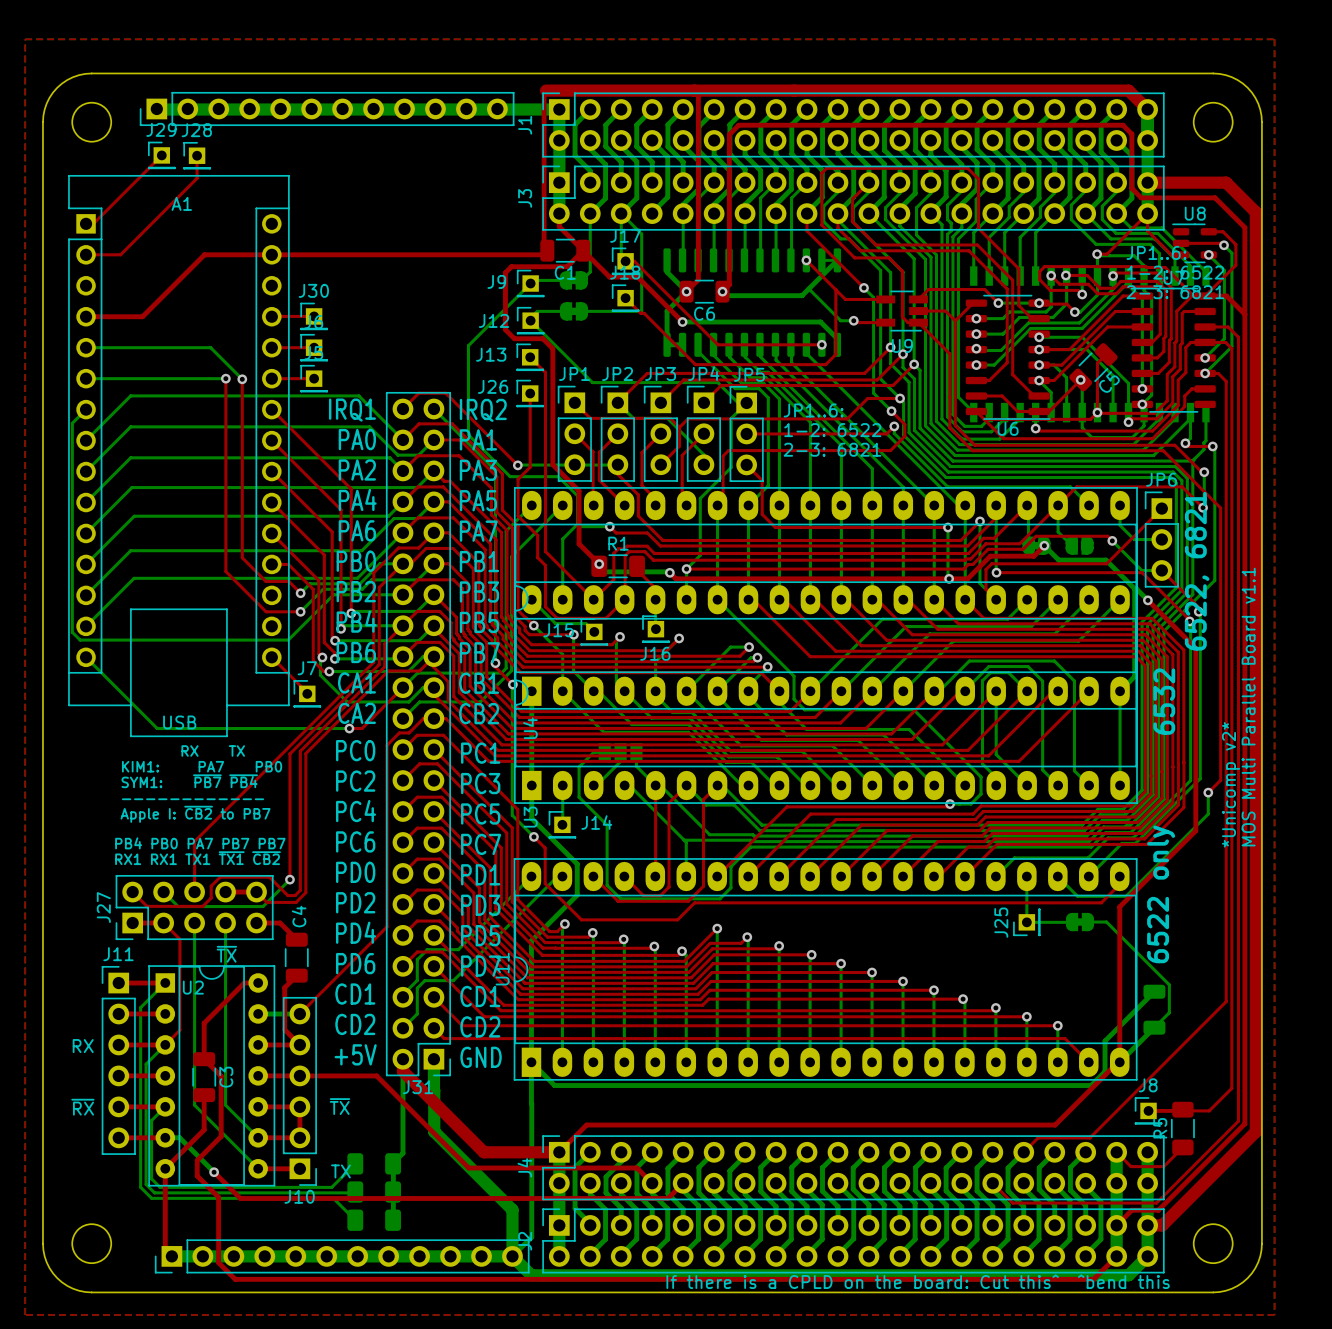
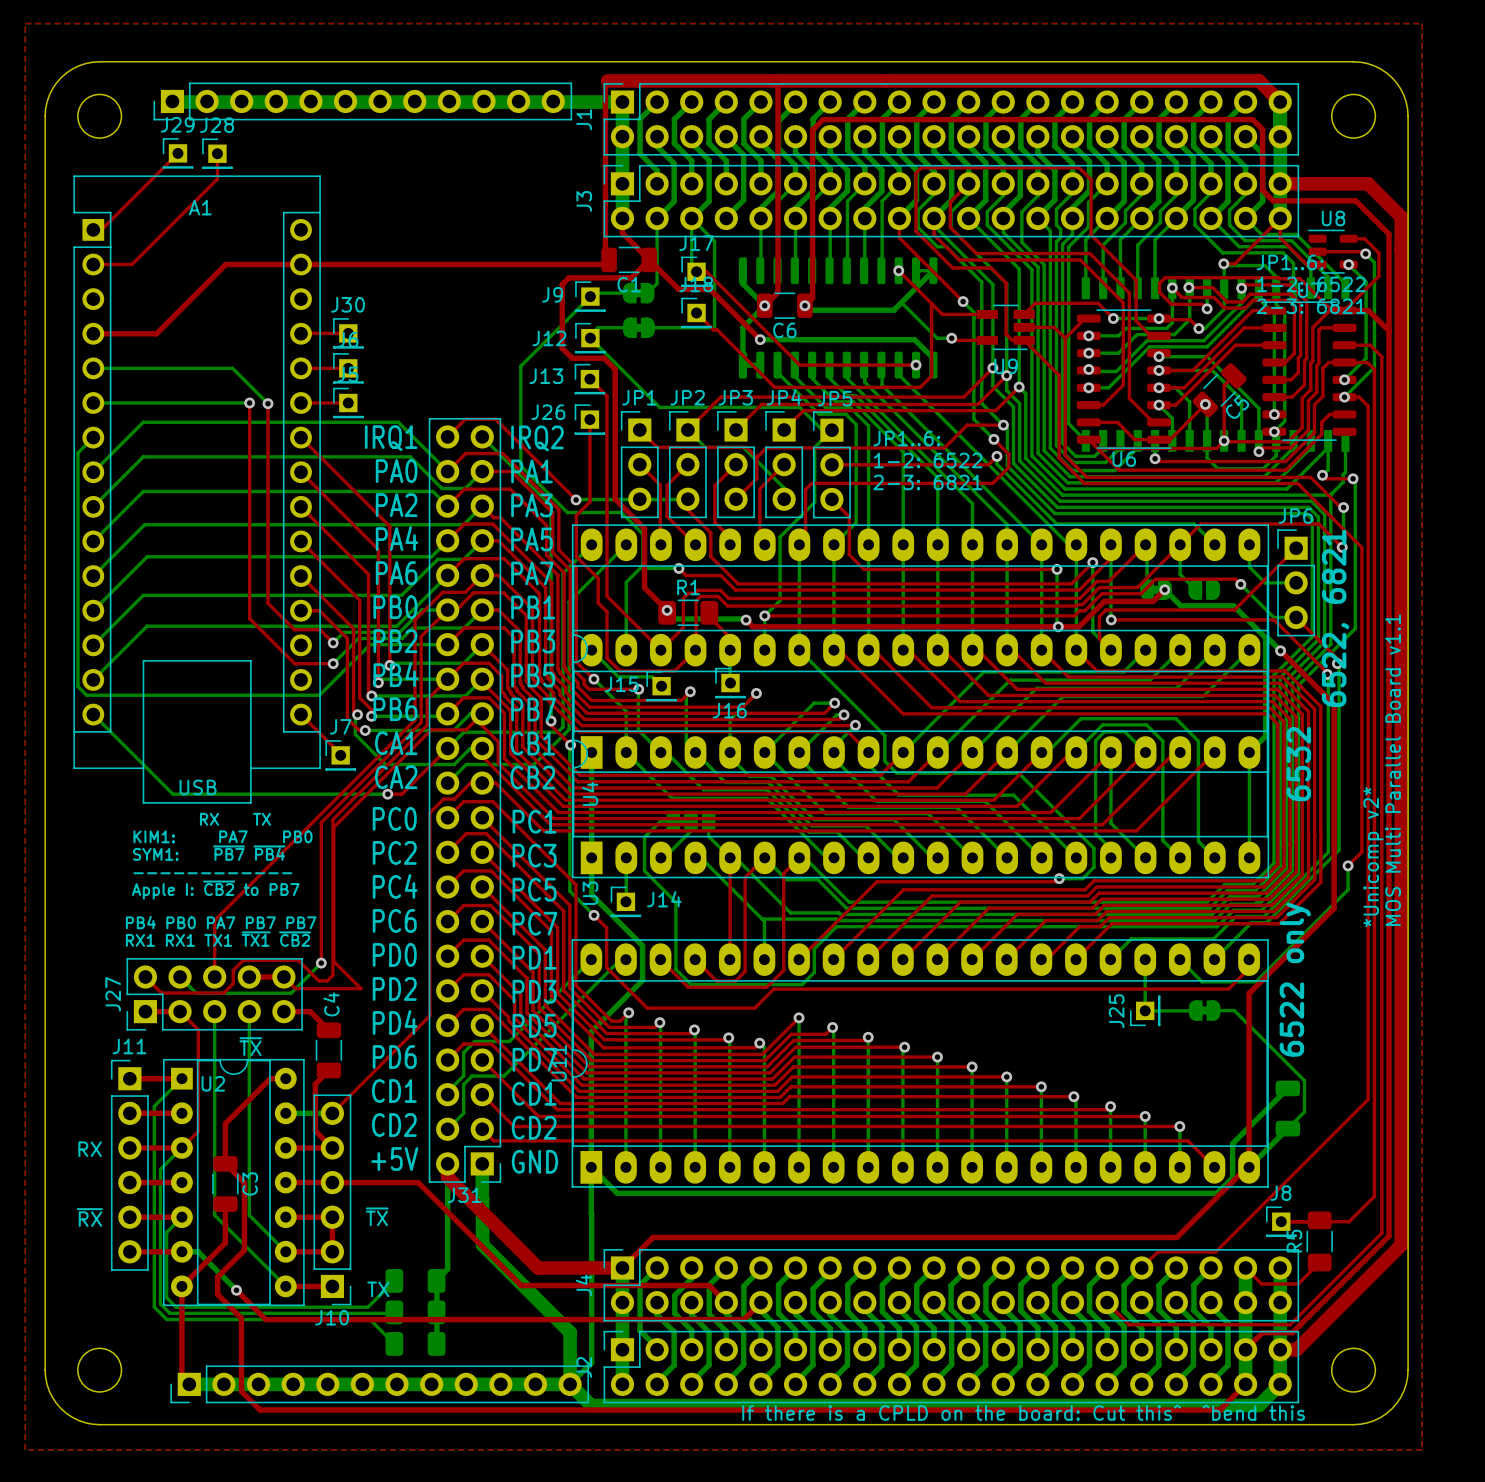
top track: (305, 753) (305, 892) (296, 902) -> (339, 822) (333, 827) (333, 961) (360, 988) (328, 988)

